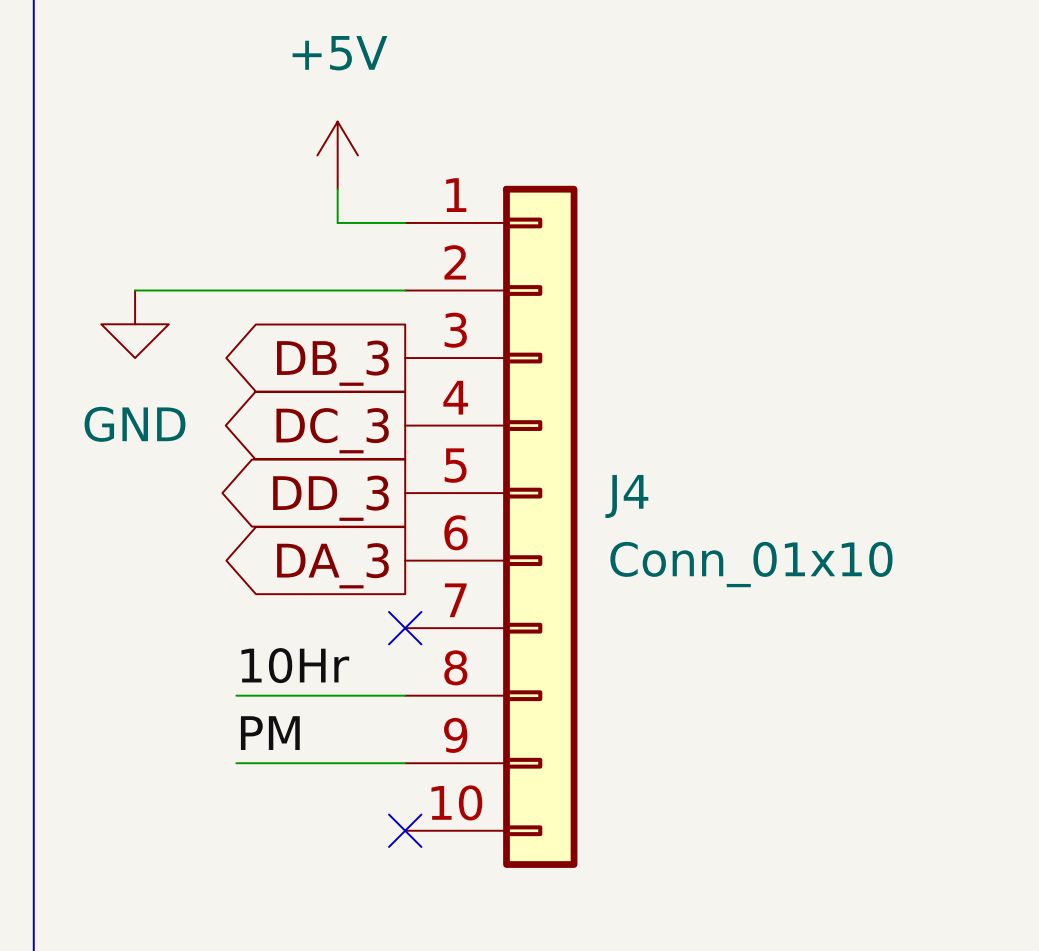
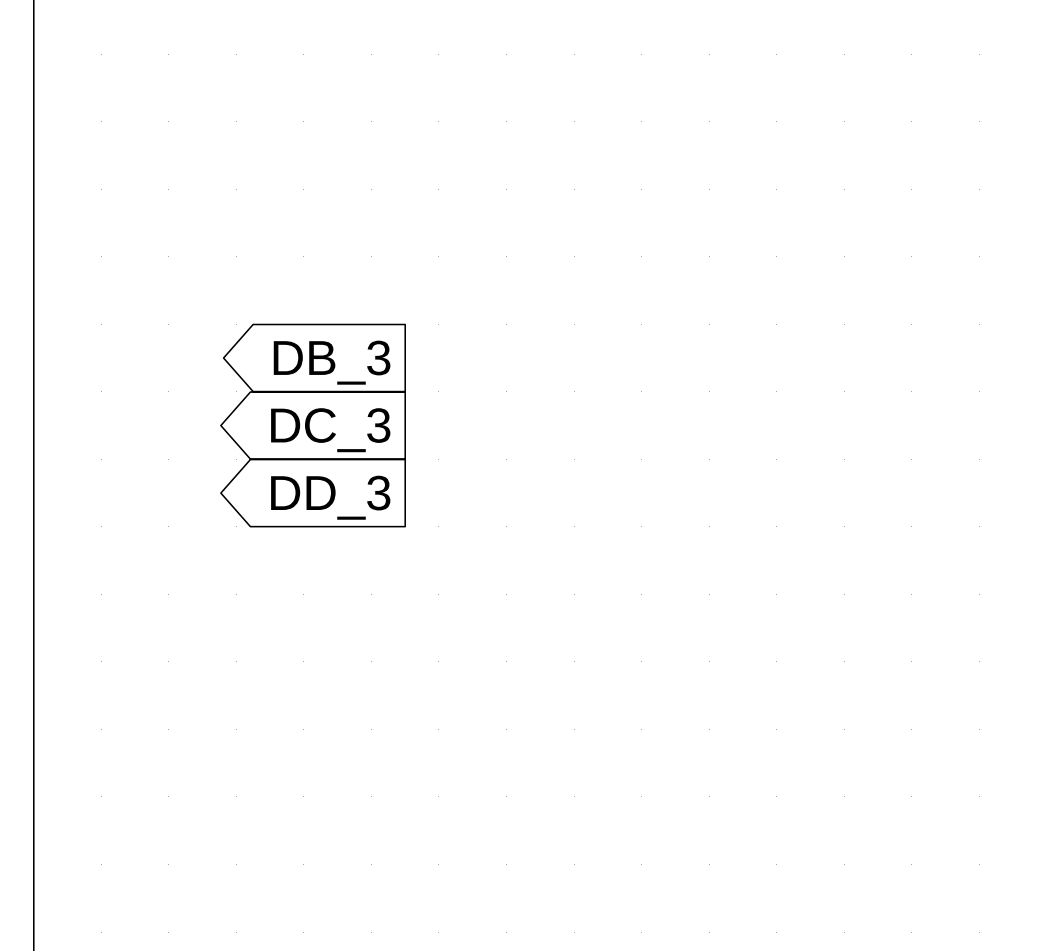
power symbol: +5V (337, 155) -> none
wire: (337, 189) (337, 222) (405, 222) -> none
wire: (135, 290) (405, 290) -> none
power symbol: GND (135, 324) -> none
J4: Conn_01x10 (491, 526) -> none
global label: DA_3 (332, 565) -> none
no-connect mark: (405, 628) -> none
label: 10Hr (295, 665) -> none
wire: (236, 695) (405, 695) -> none
label: PM (270, 733) -> none
wire: (236, 763) (405, 763) -> none
no-connect mark: (405, 830) -> none

